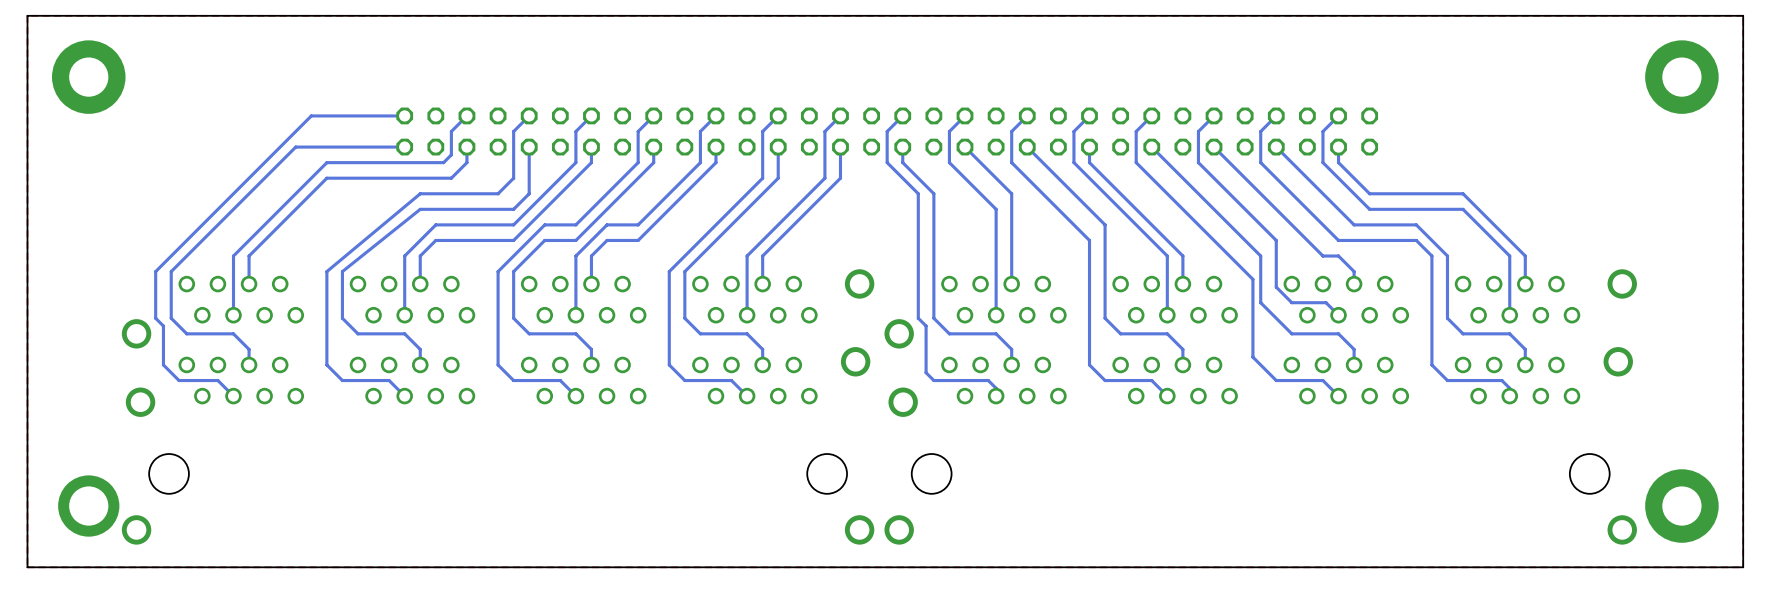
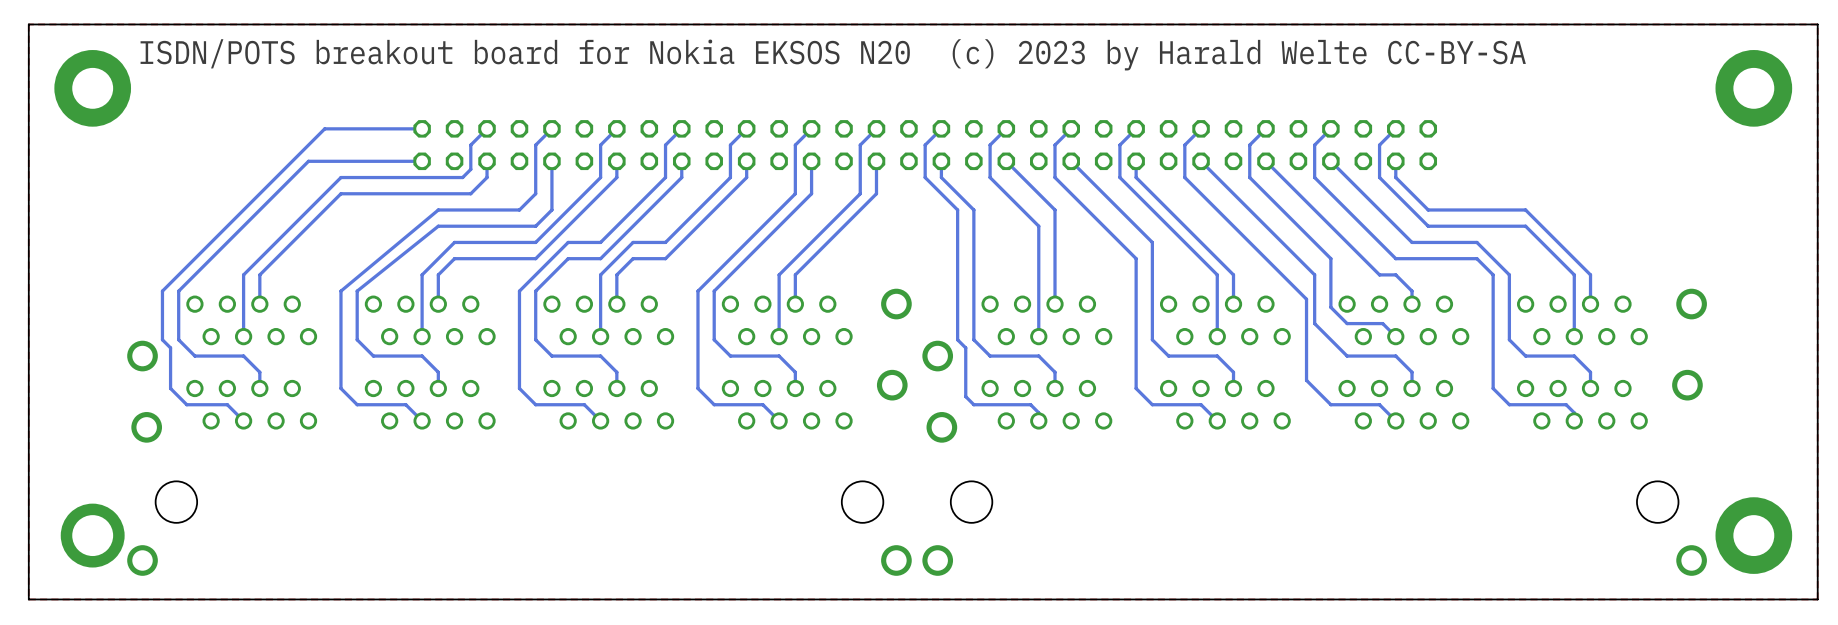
text: none -> ISDN/POTS breakout board for Nokia EKSOS N20 (c) 2023 by Harald Welte CC-BY-SA (833, 54)

